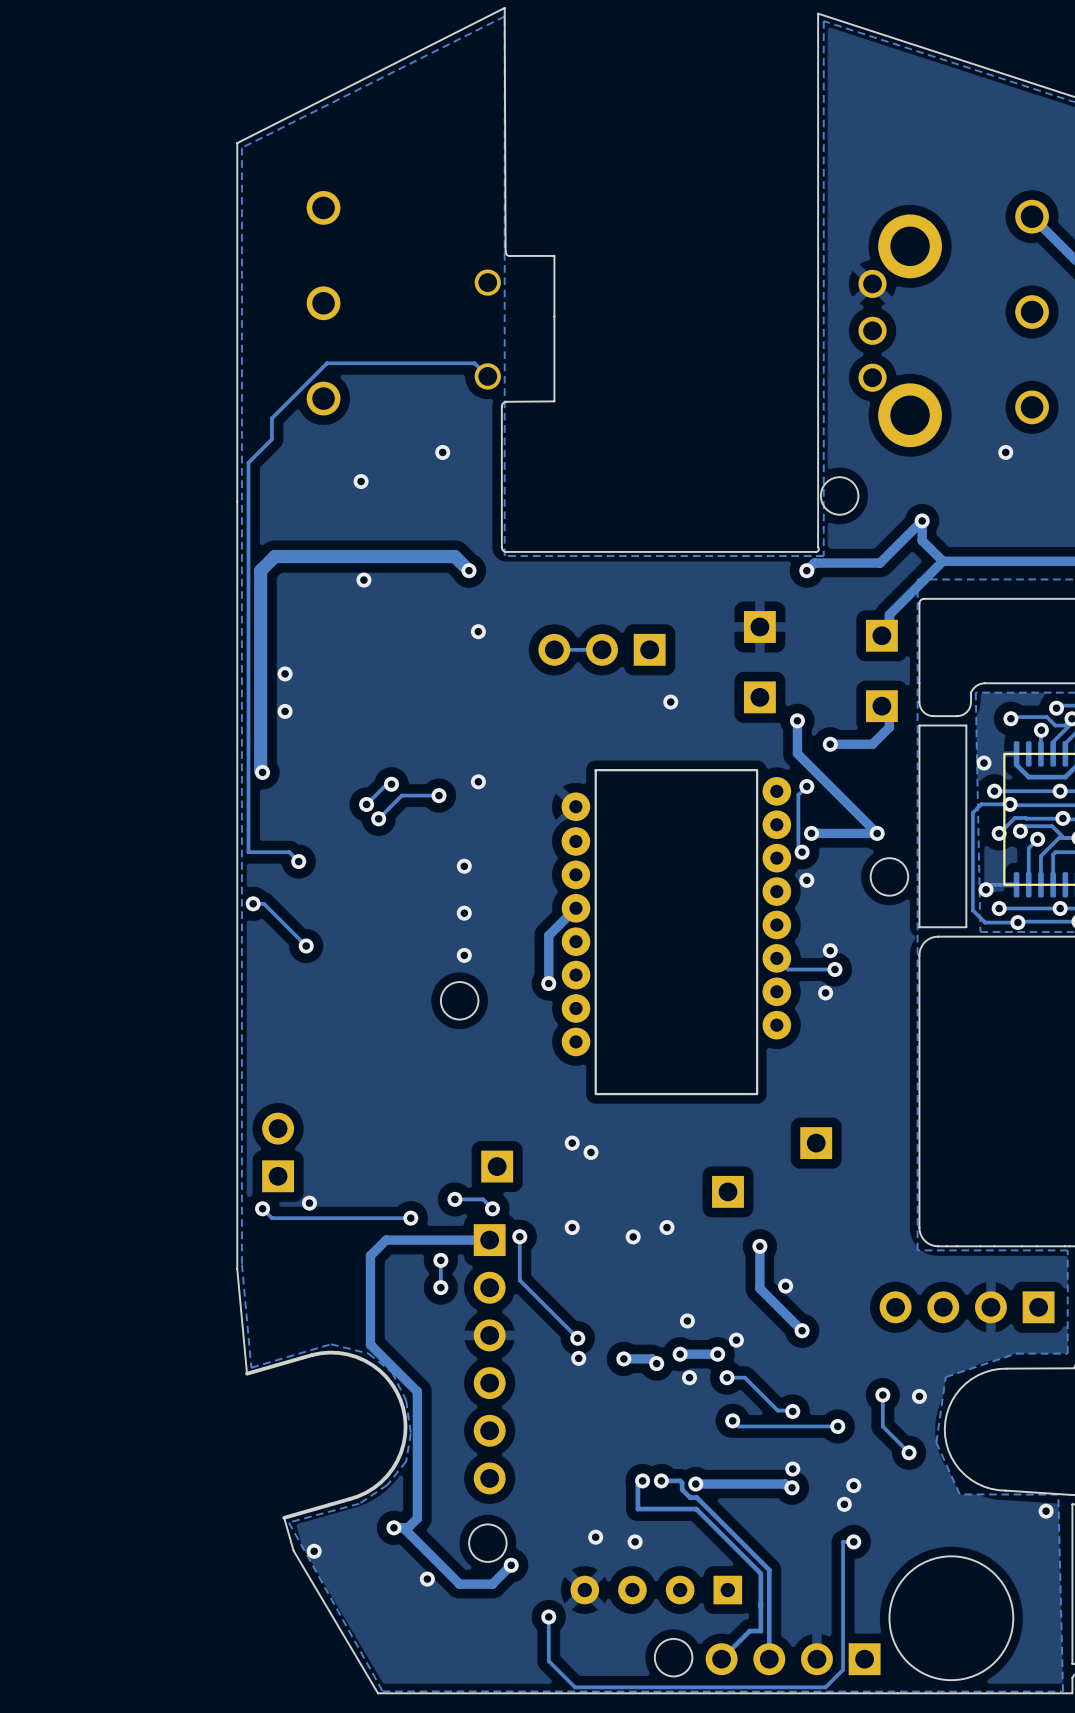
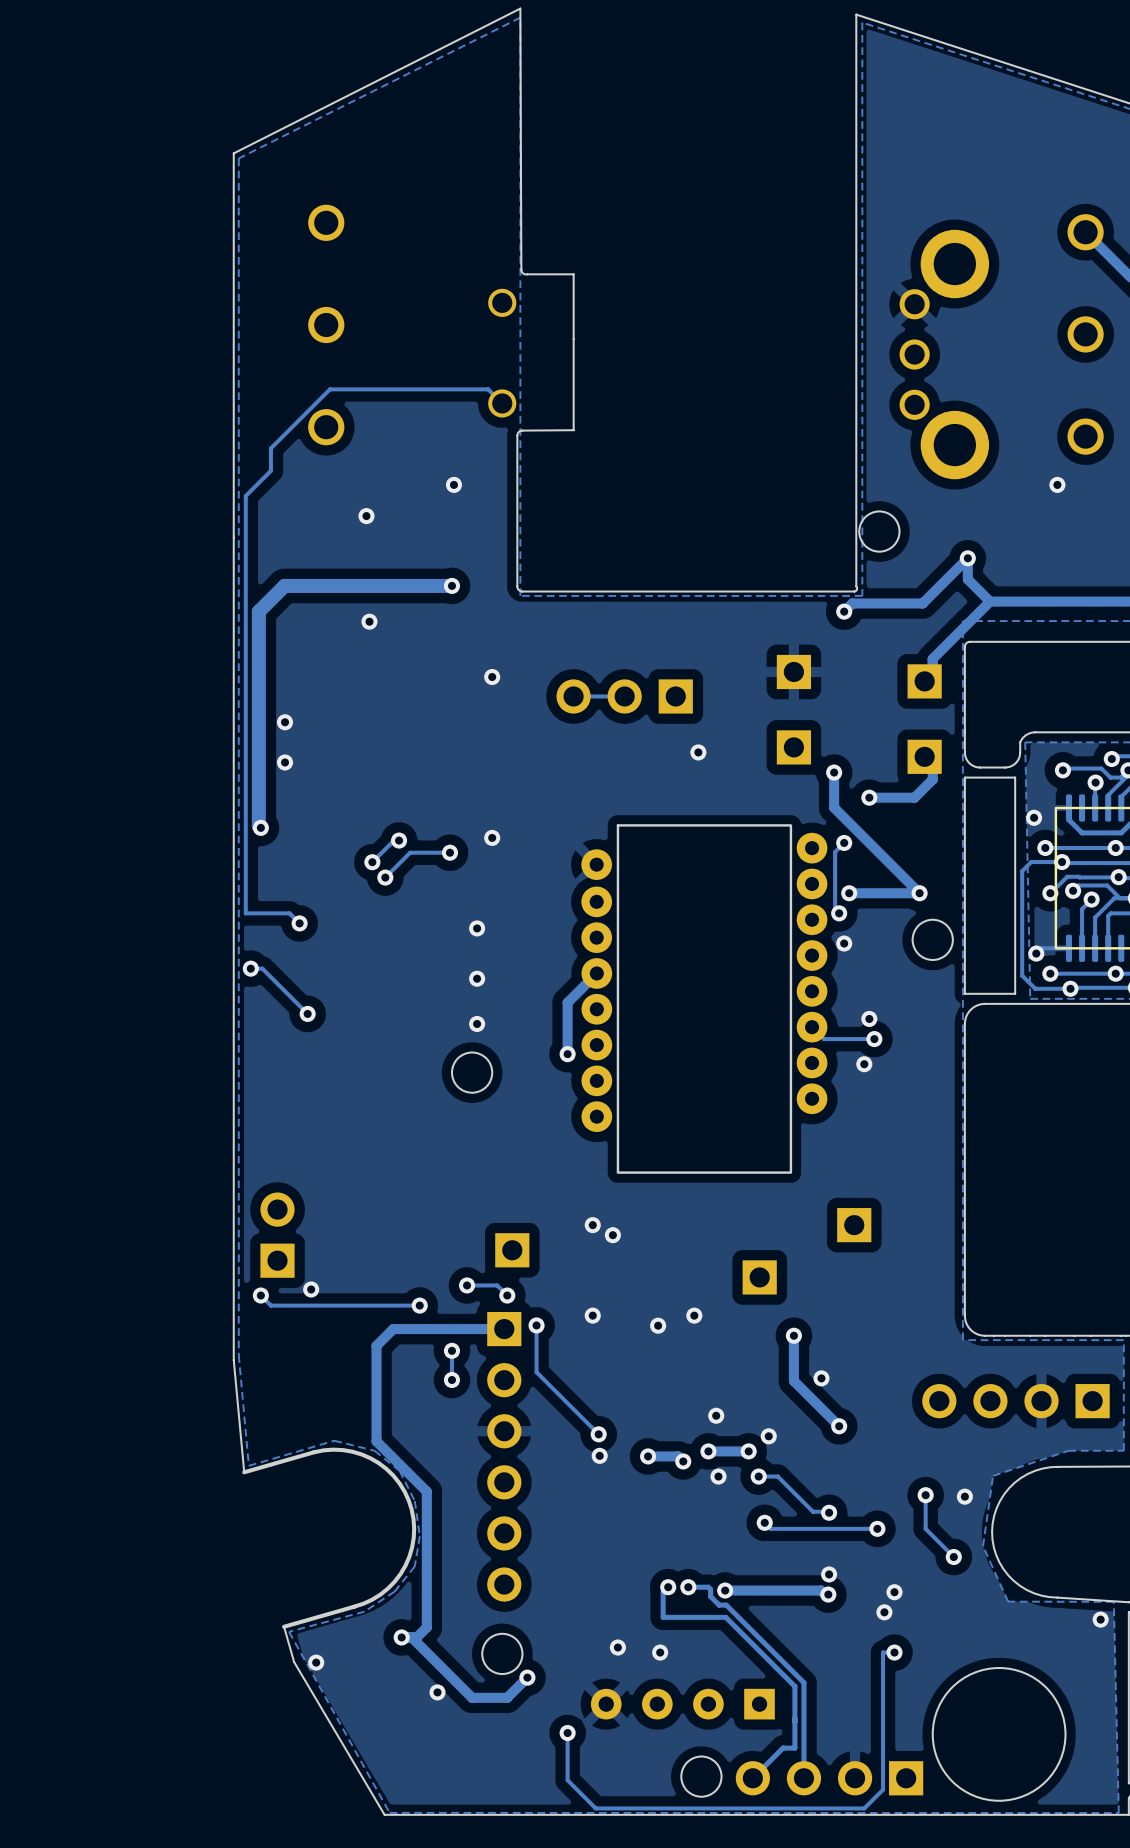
track: (274, 556) (454, 556) (469, 570) -> (273, 596) (284, 585) (451, 585)
via position: (469, 570) -> (451, 585)

